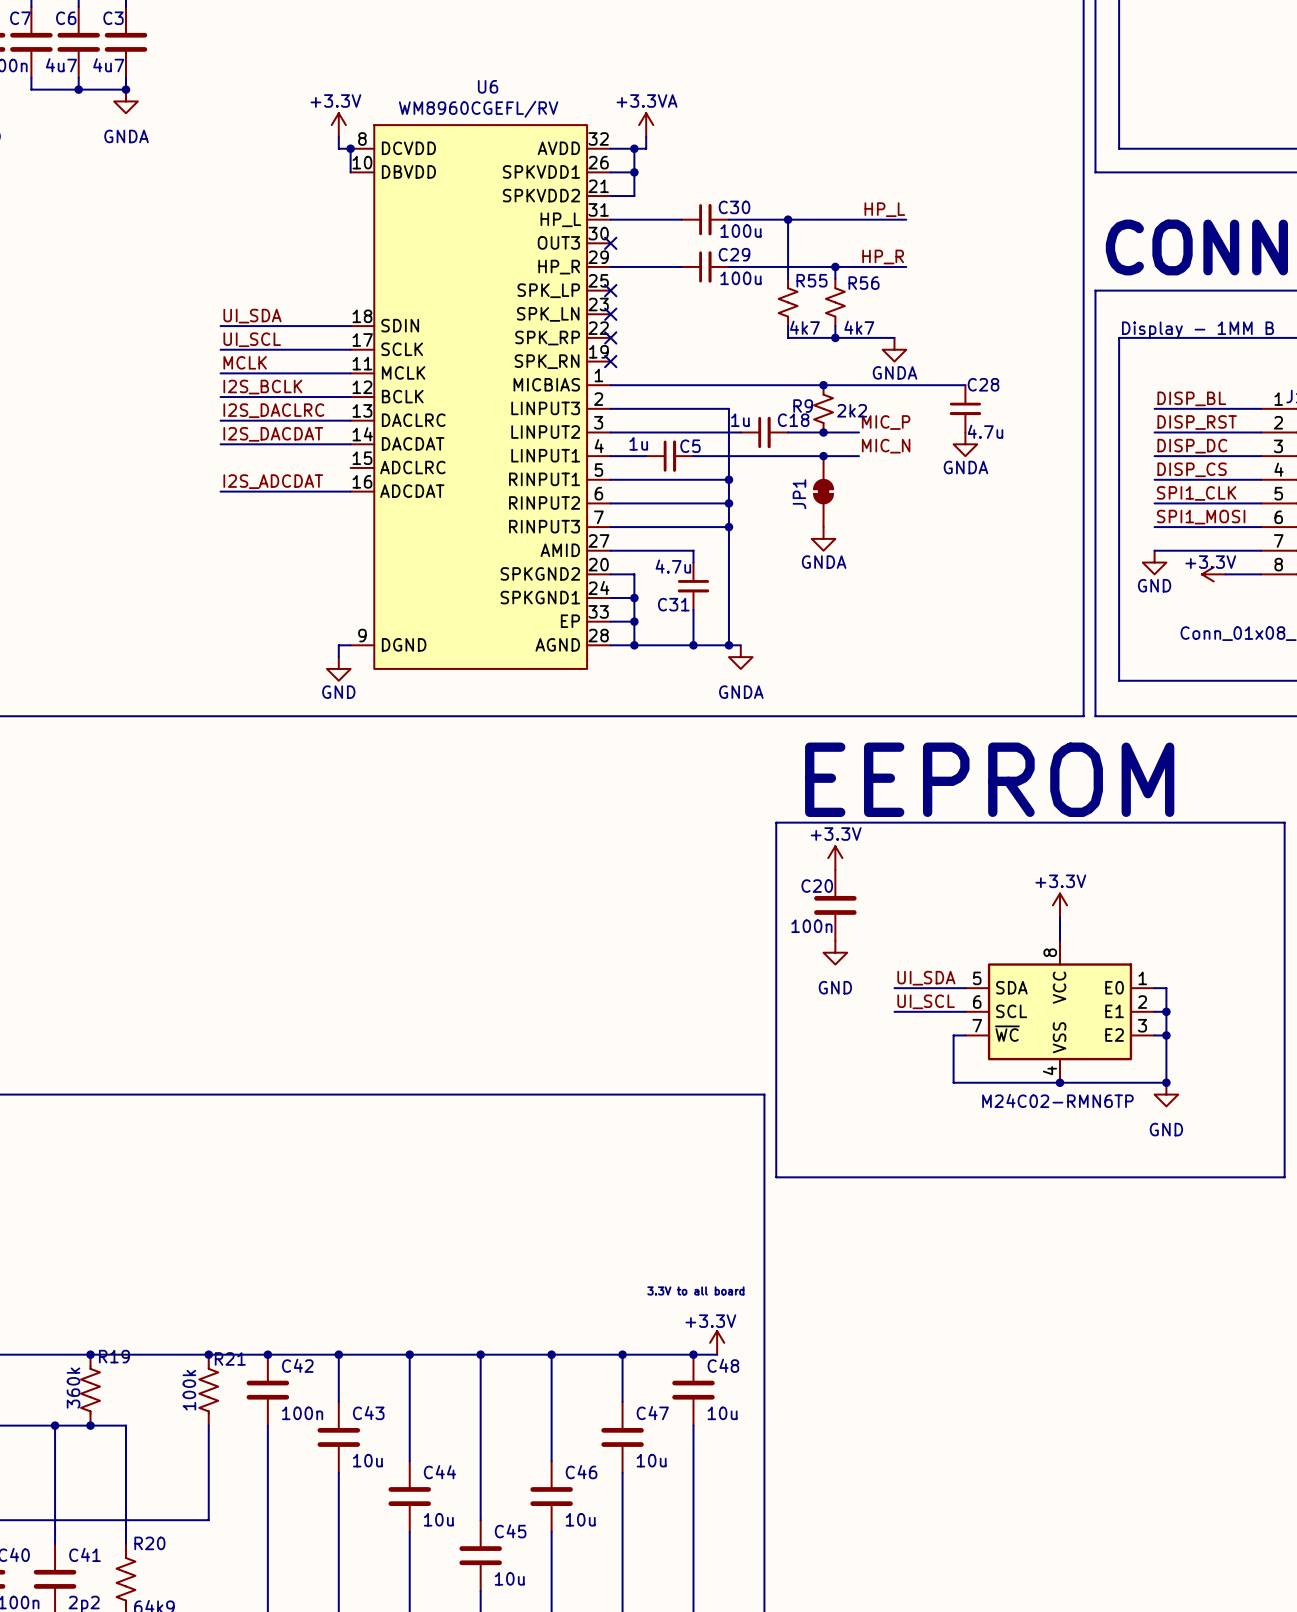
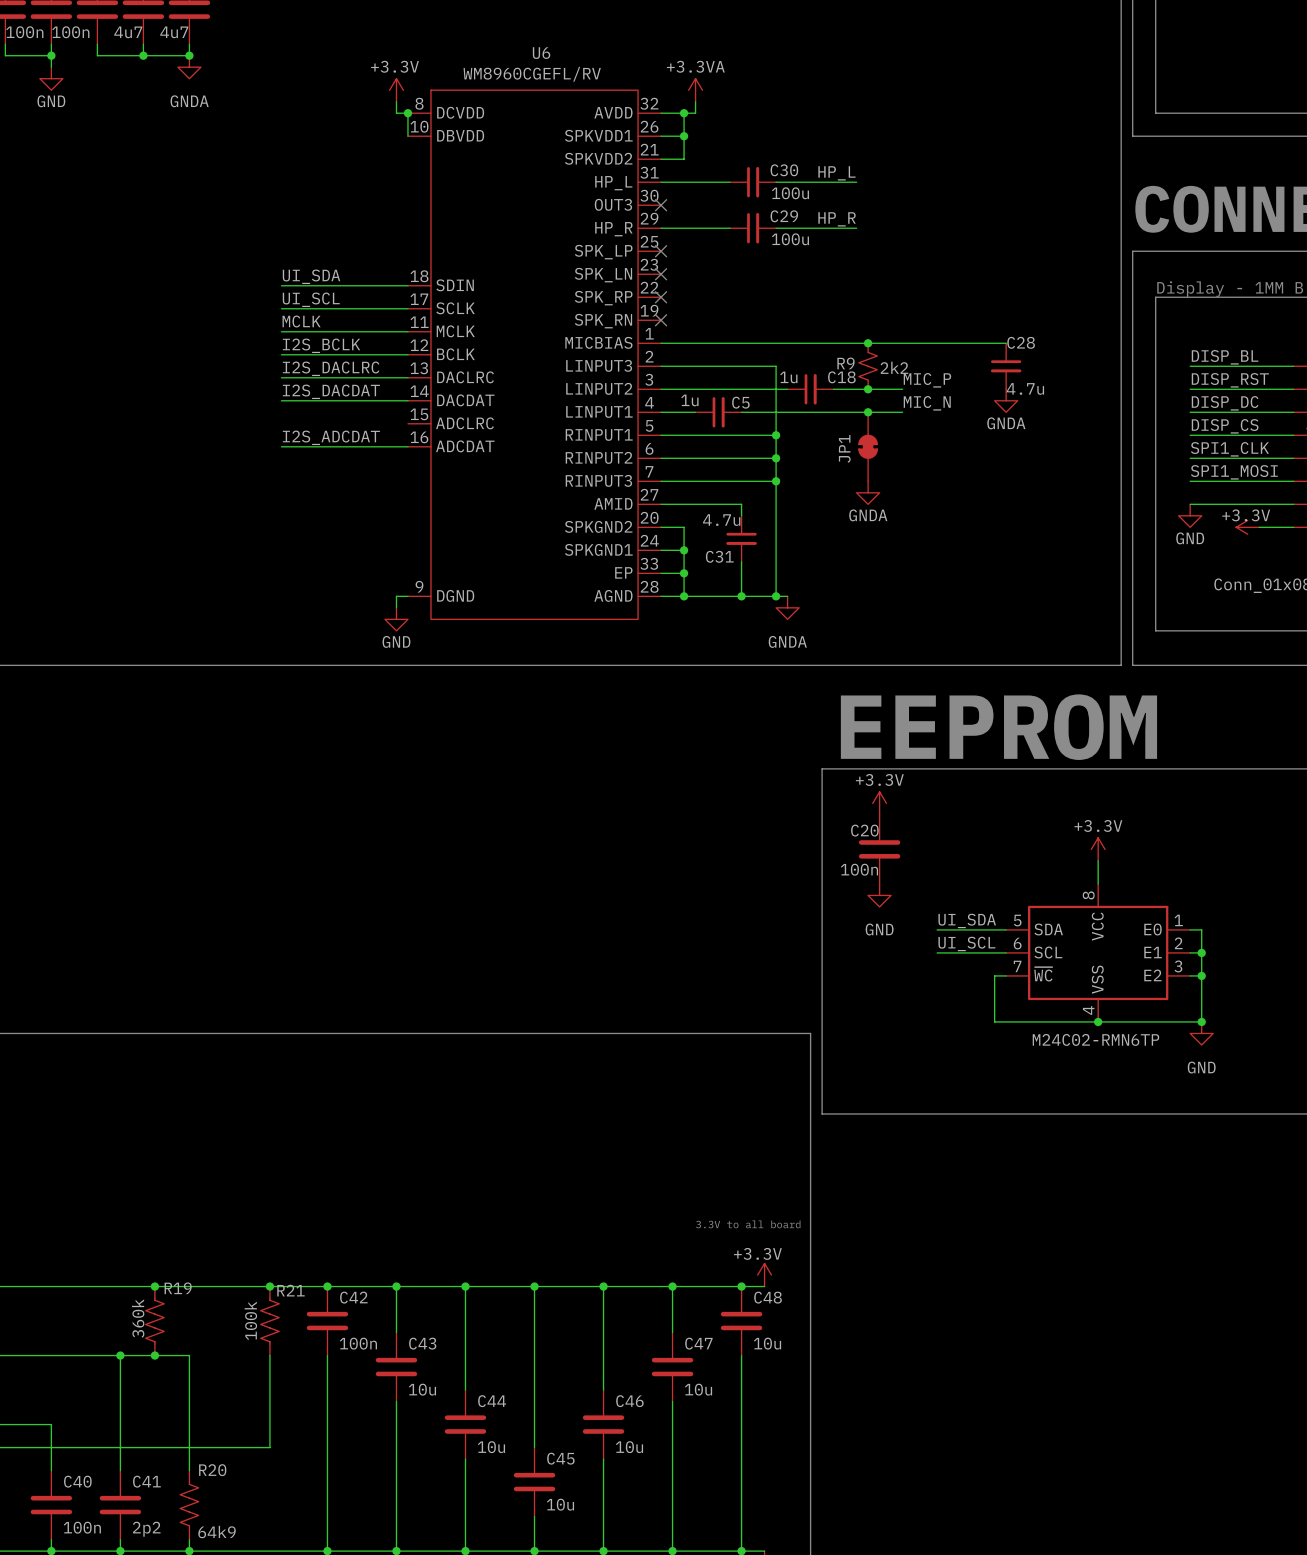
label position: HP_L (884, 209) -> HP_L (836, 173)
wire: (788, 219) (788, 278) -> none
junction: (788, 219) -> none
wire: (811, 219) (906, 219) -> none
label position: HP_R (883, 256) -> HP_R (837, 219)
wire: (811, 266) (906, 266) -> none
wire: (835, 266) (835, 278) -> none
junction: (835, 266) -> none
R55: 4k7 (788, 302) -> none
R56: 4k7 (835, 302) -> none
wire: (788, 326) (788, 337) (894, 337) -> none
wire: (835, 326) (835, 337) -> none
junction: (835, 337) -> none
power symbol: GNDA (894, 349) -> none

